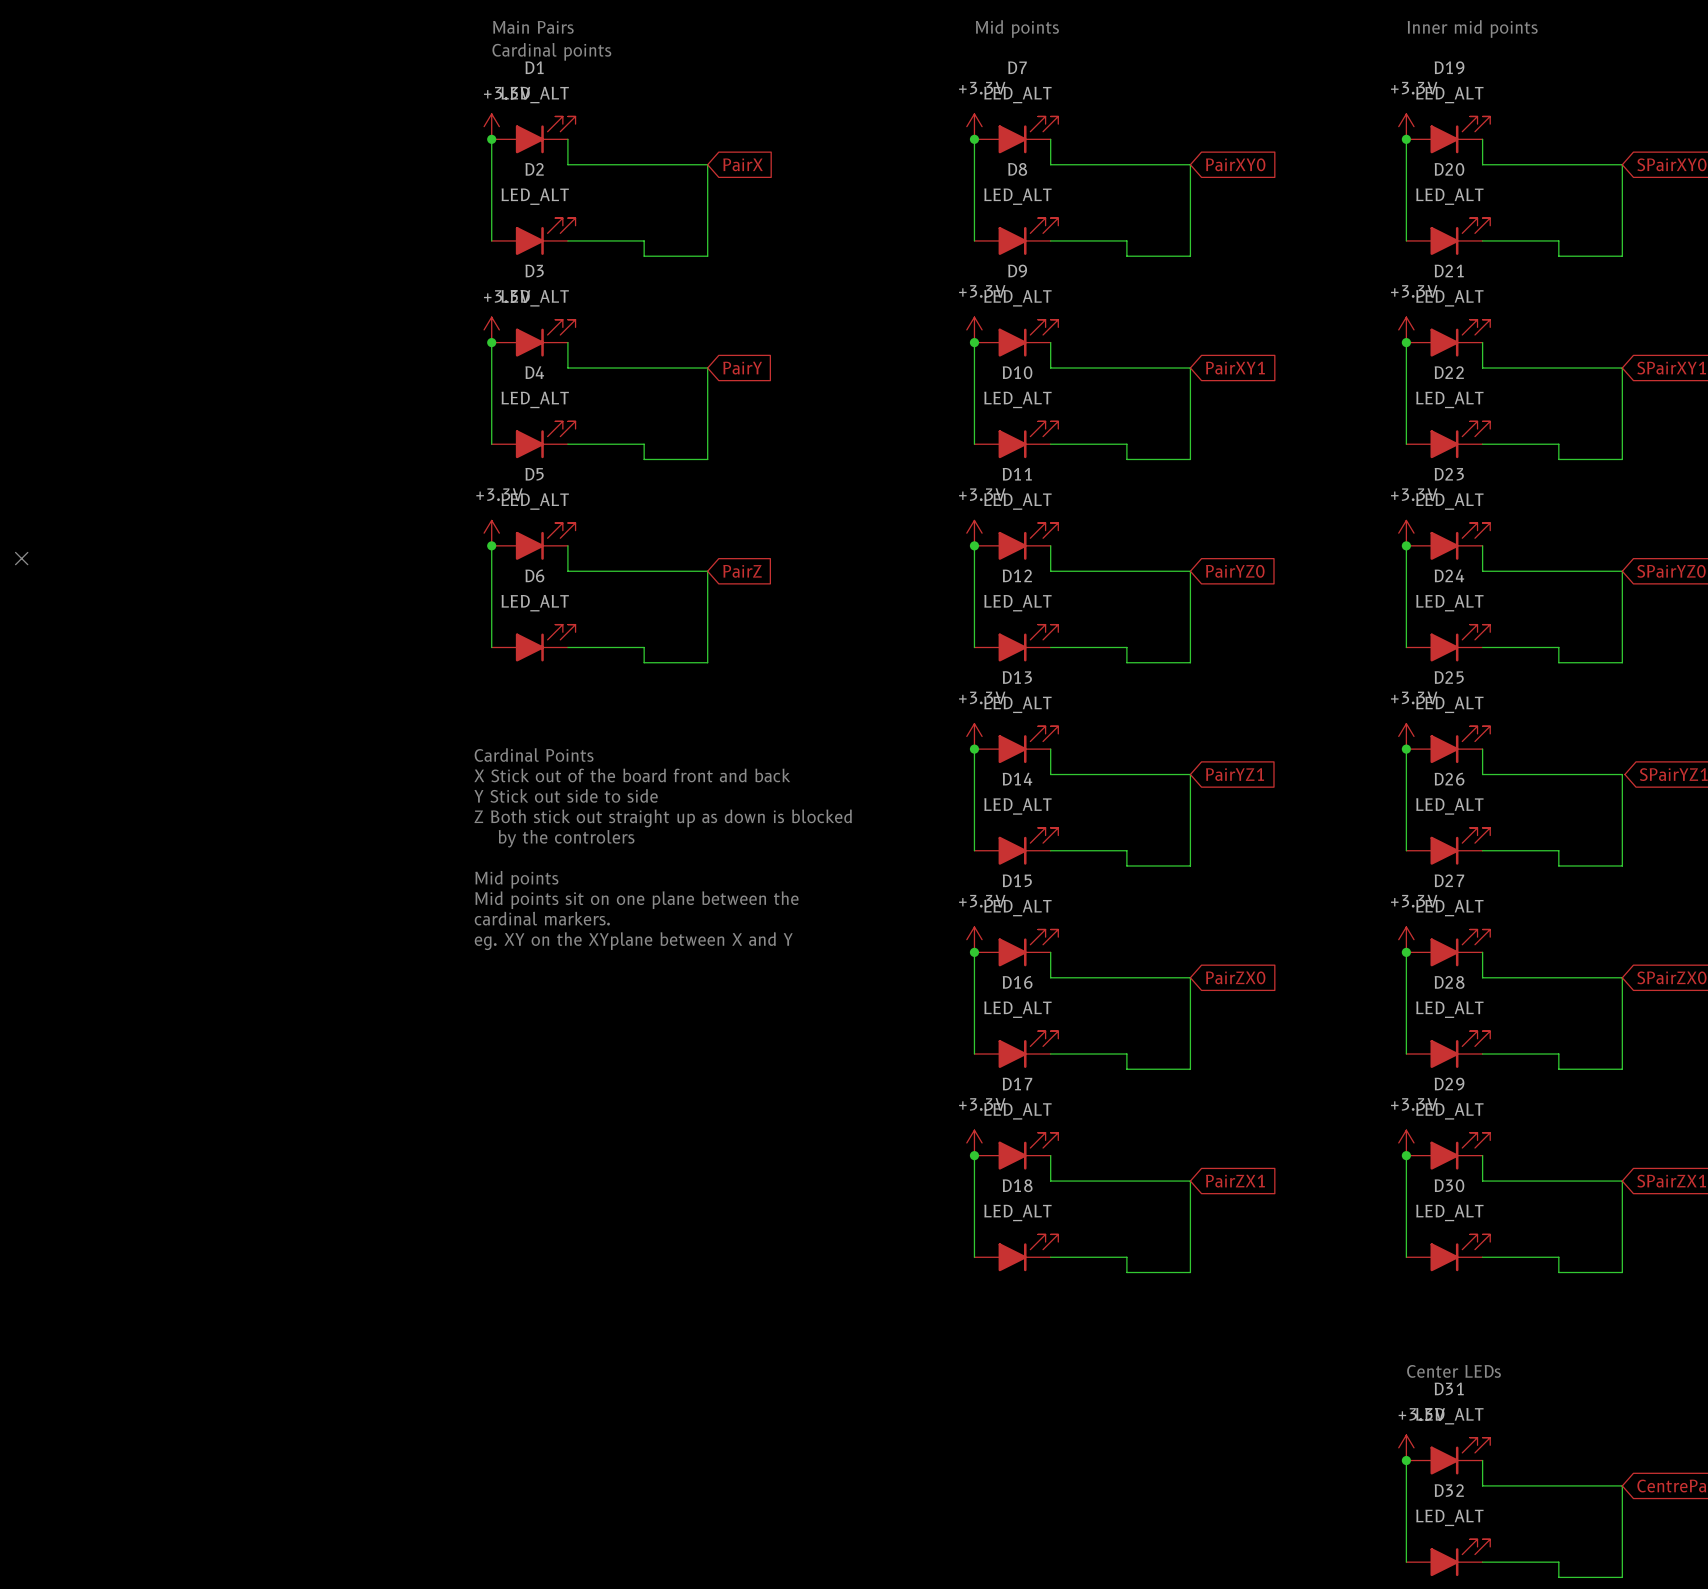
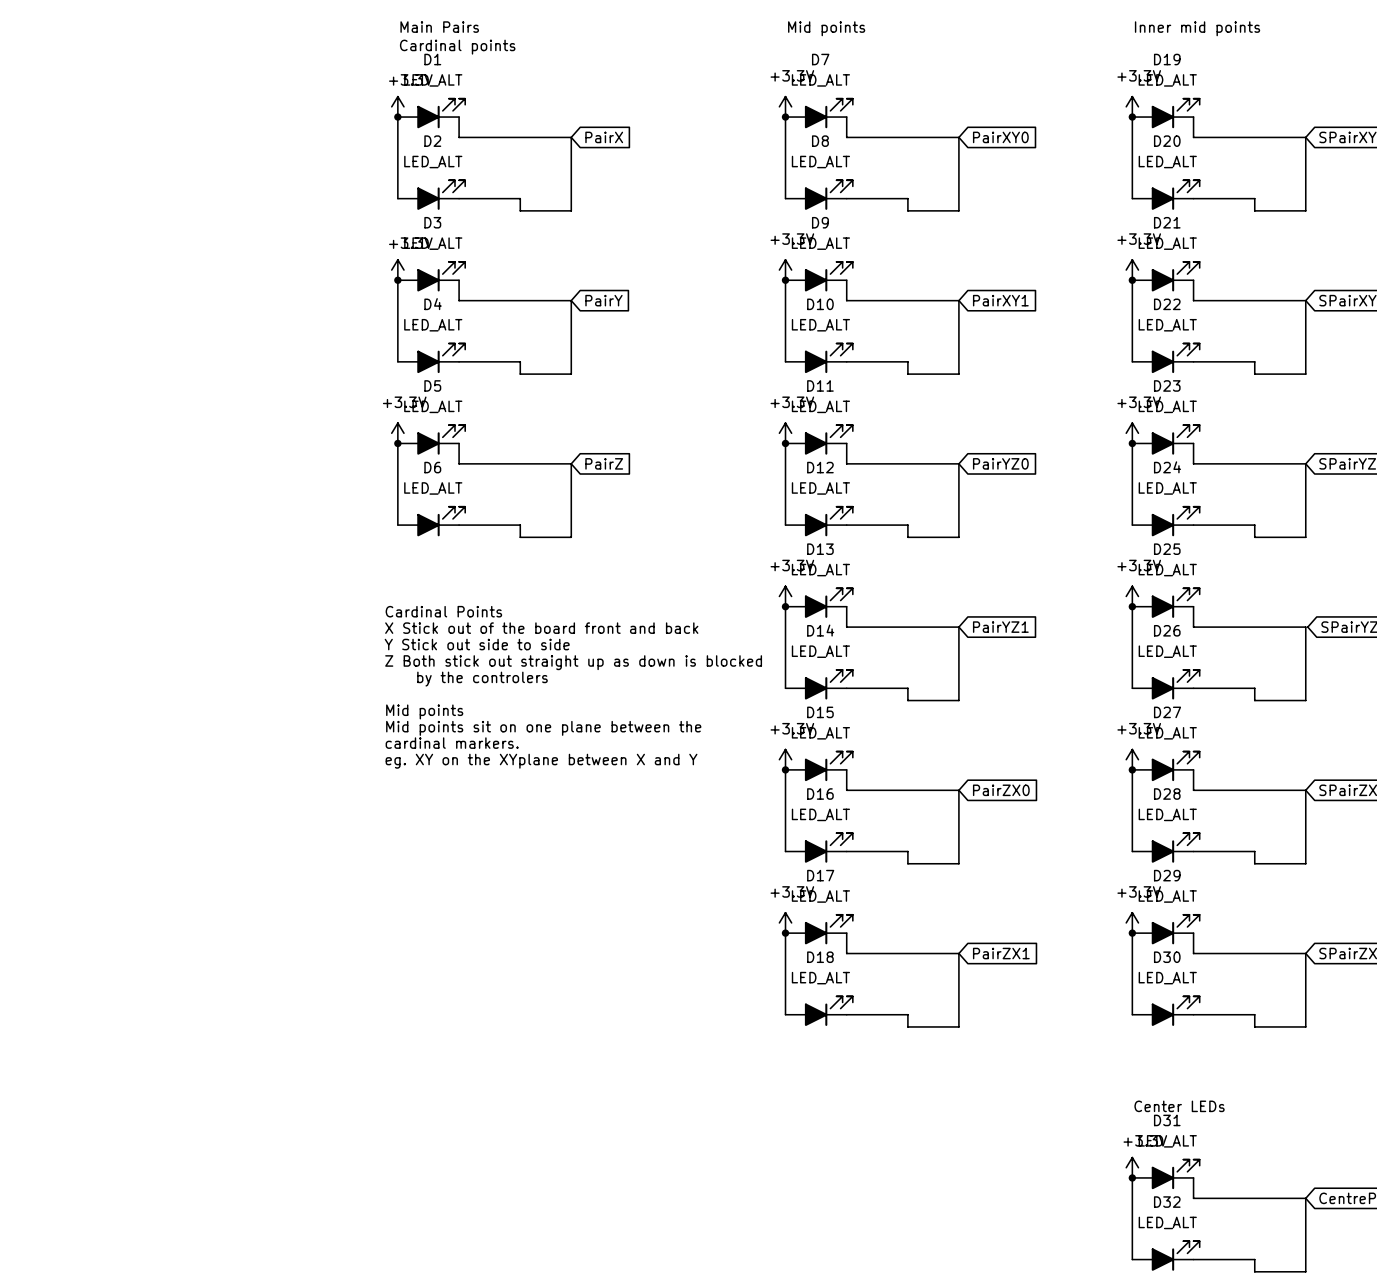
no-connect mark: (21, 558) -> none

